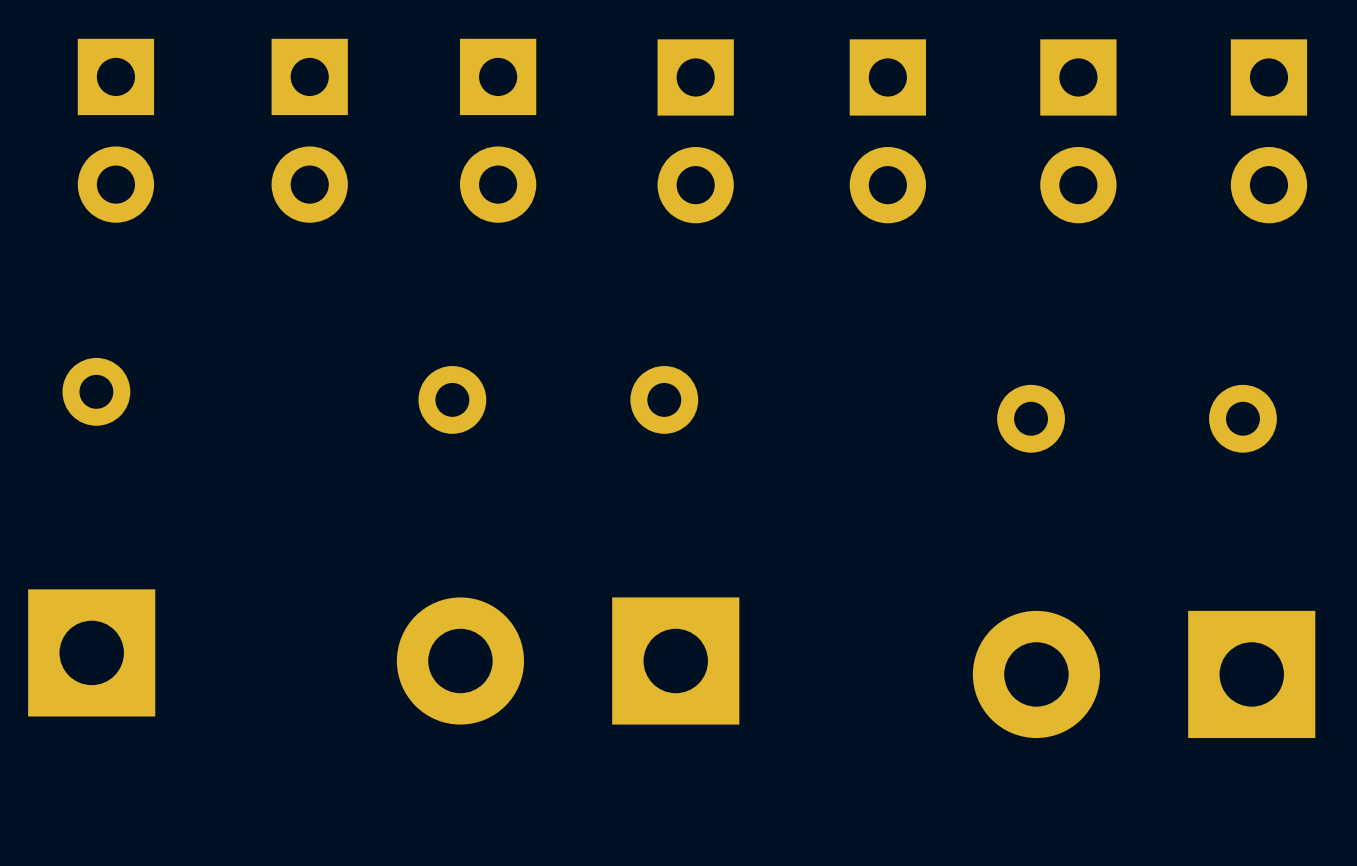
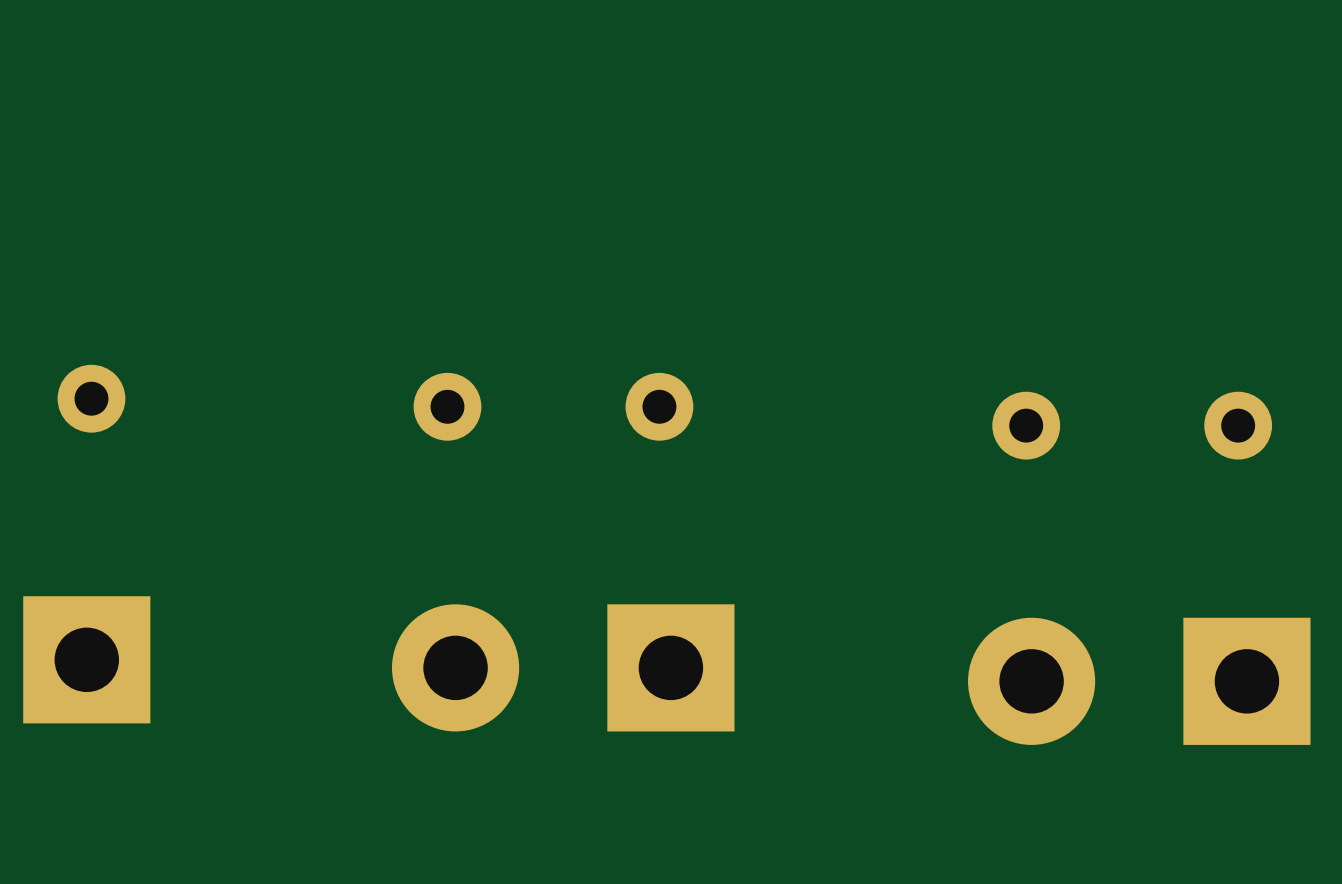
part: (115, 130) -> none
part: (309, 130) -> none
part: (498, 130) -> none
part: (695, 131) -> none
part: (887, 131) -> none
part: (1078, 131) -> none
part: (1268, 131) -> none

